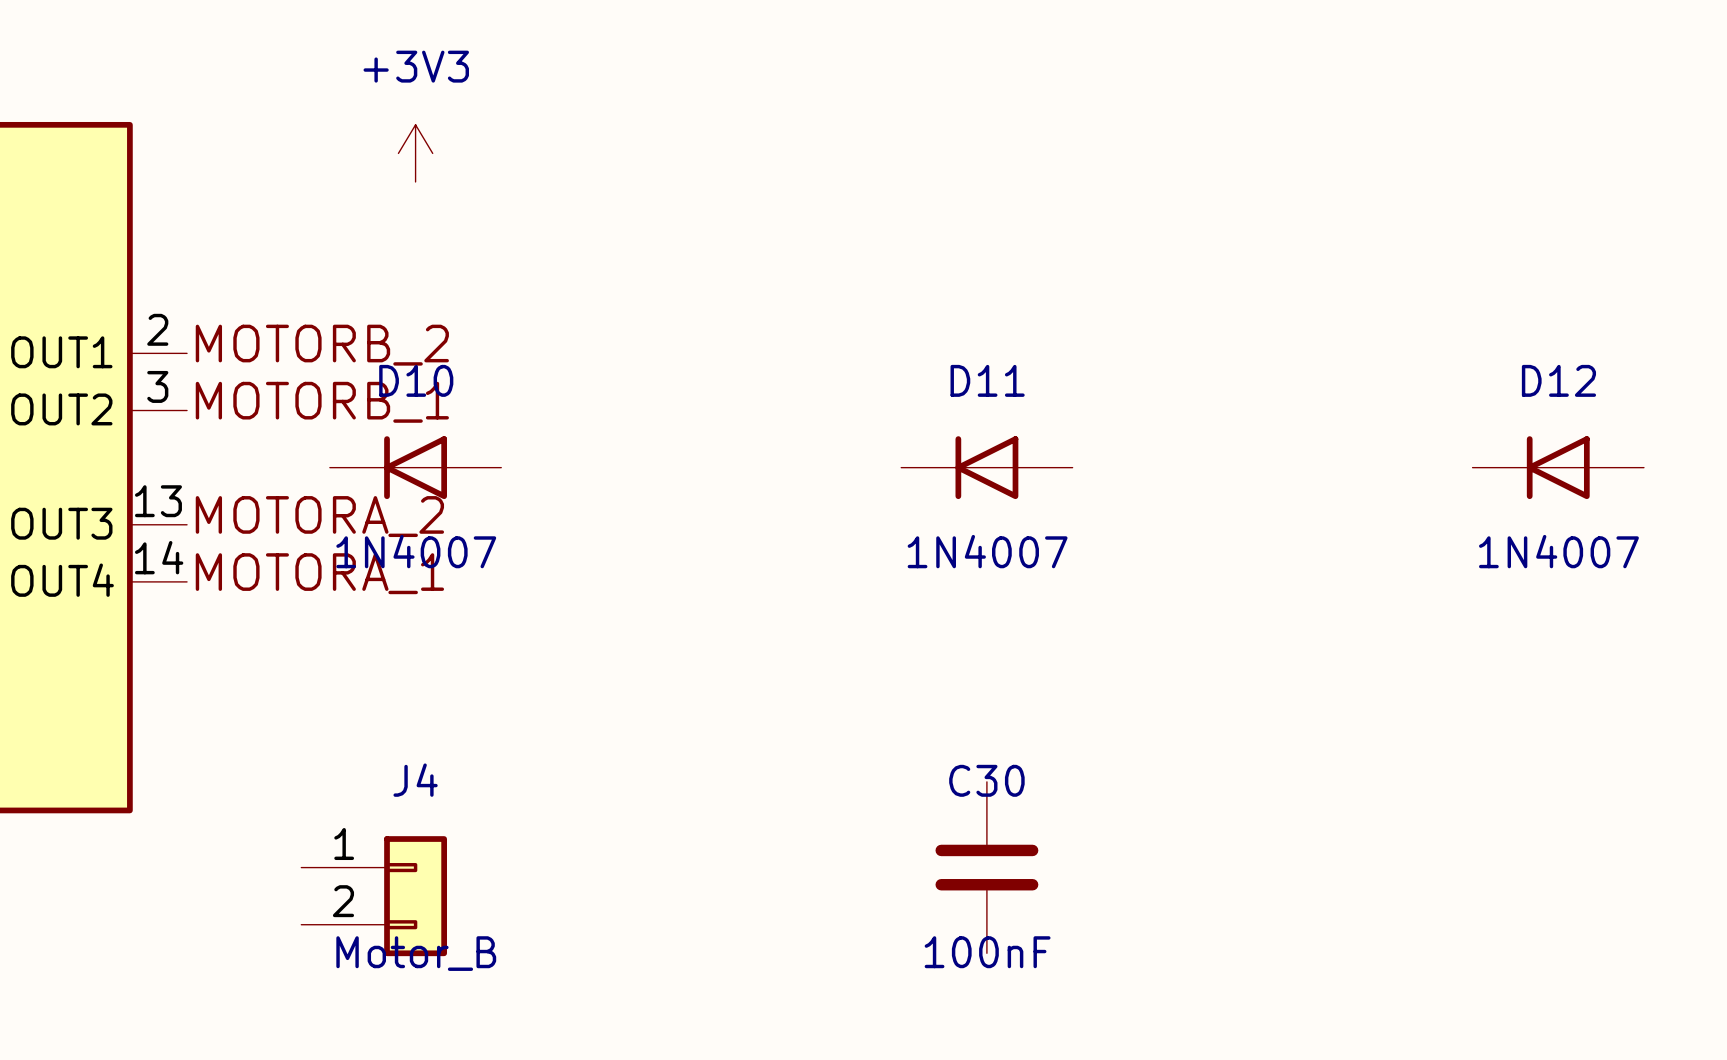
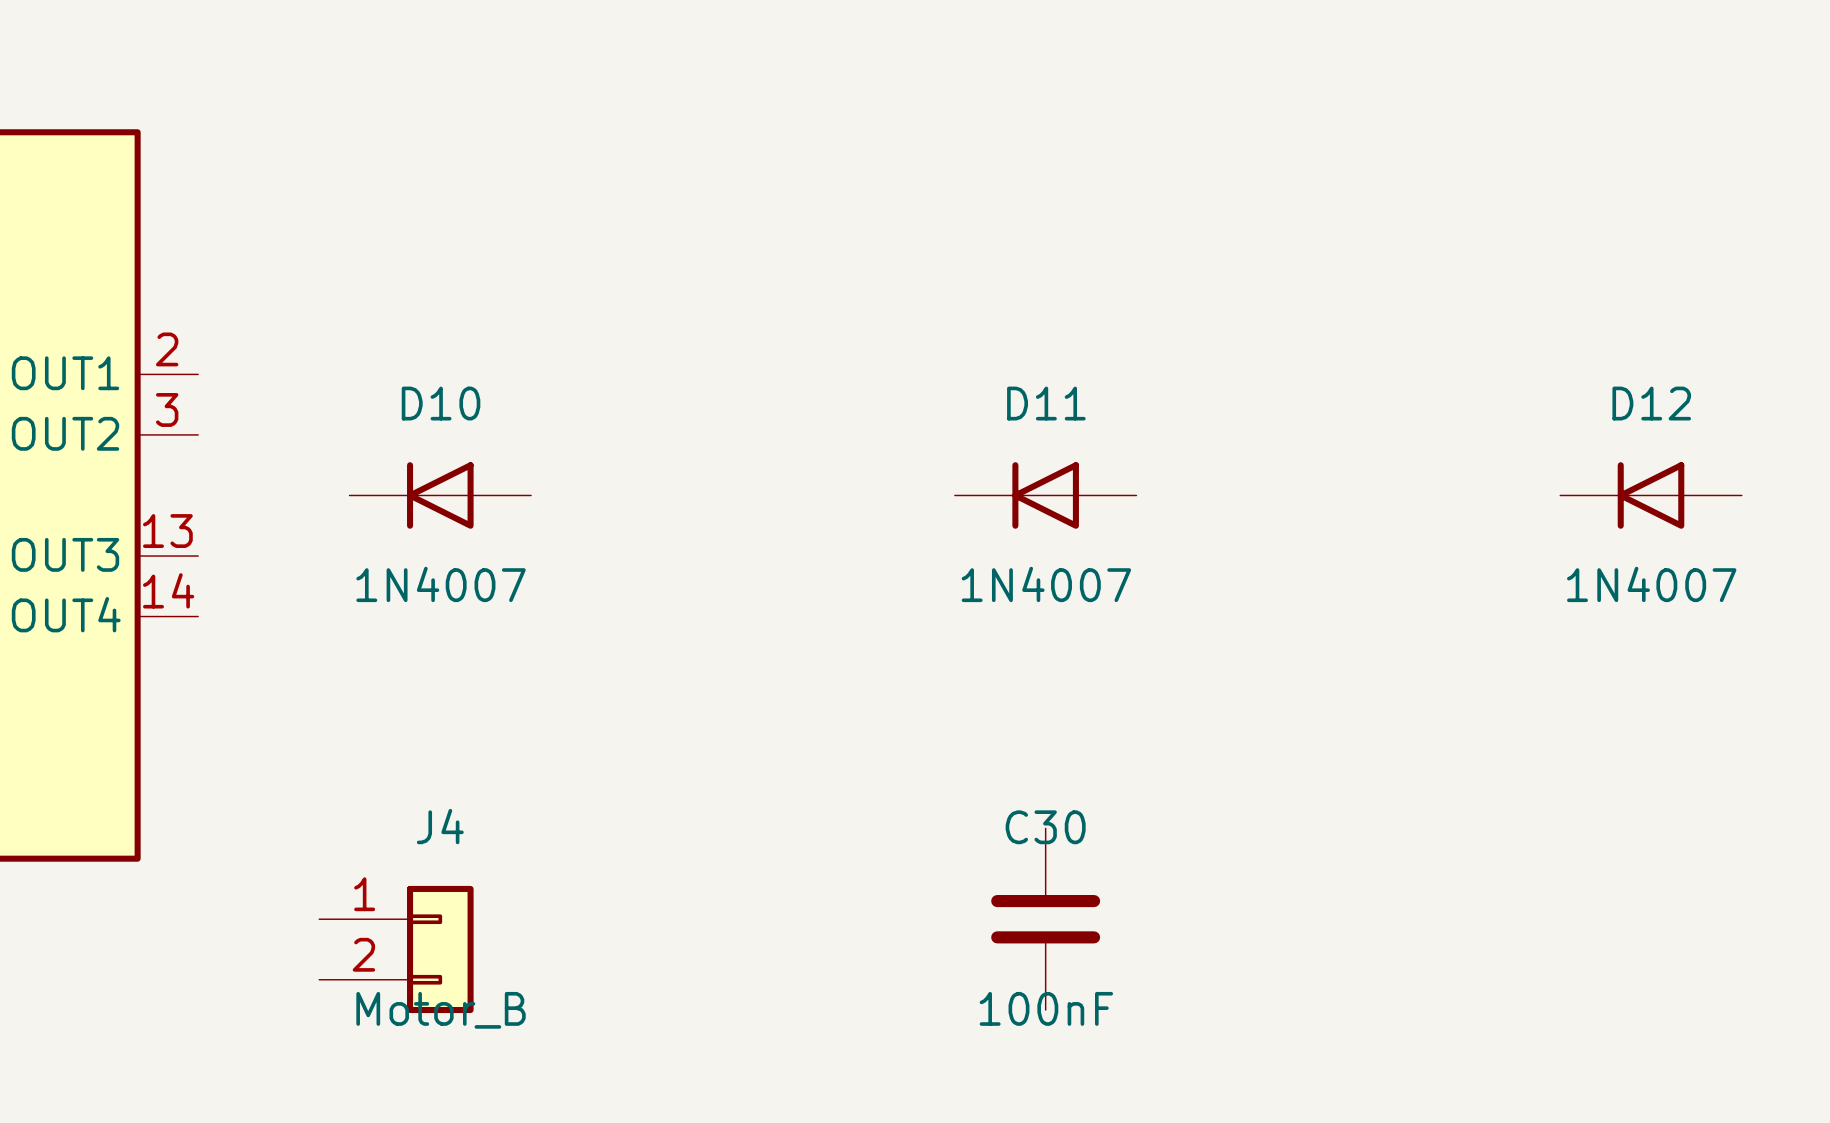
power symbol: +3V3 (415, 153) -> none
label: MOTORB_2 (322, 345) -> none
label: MOTORB_1 (322, 402) -> none
label: MOTORA_2 (319, 516) -> none
label: MOTORA_1 (319, 573) -> none

